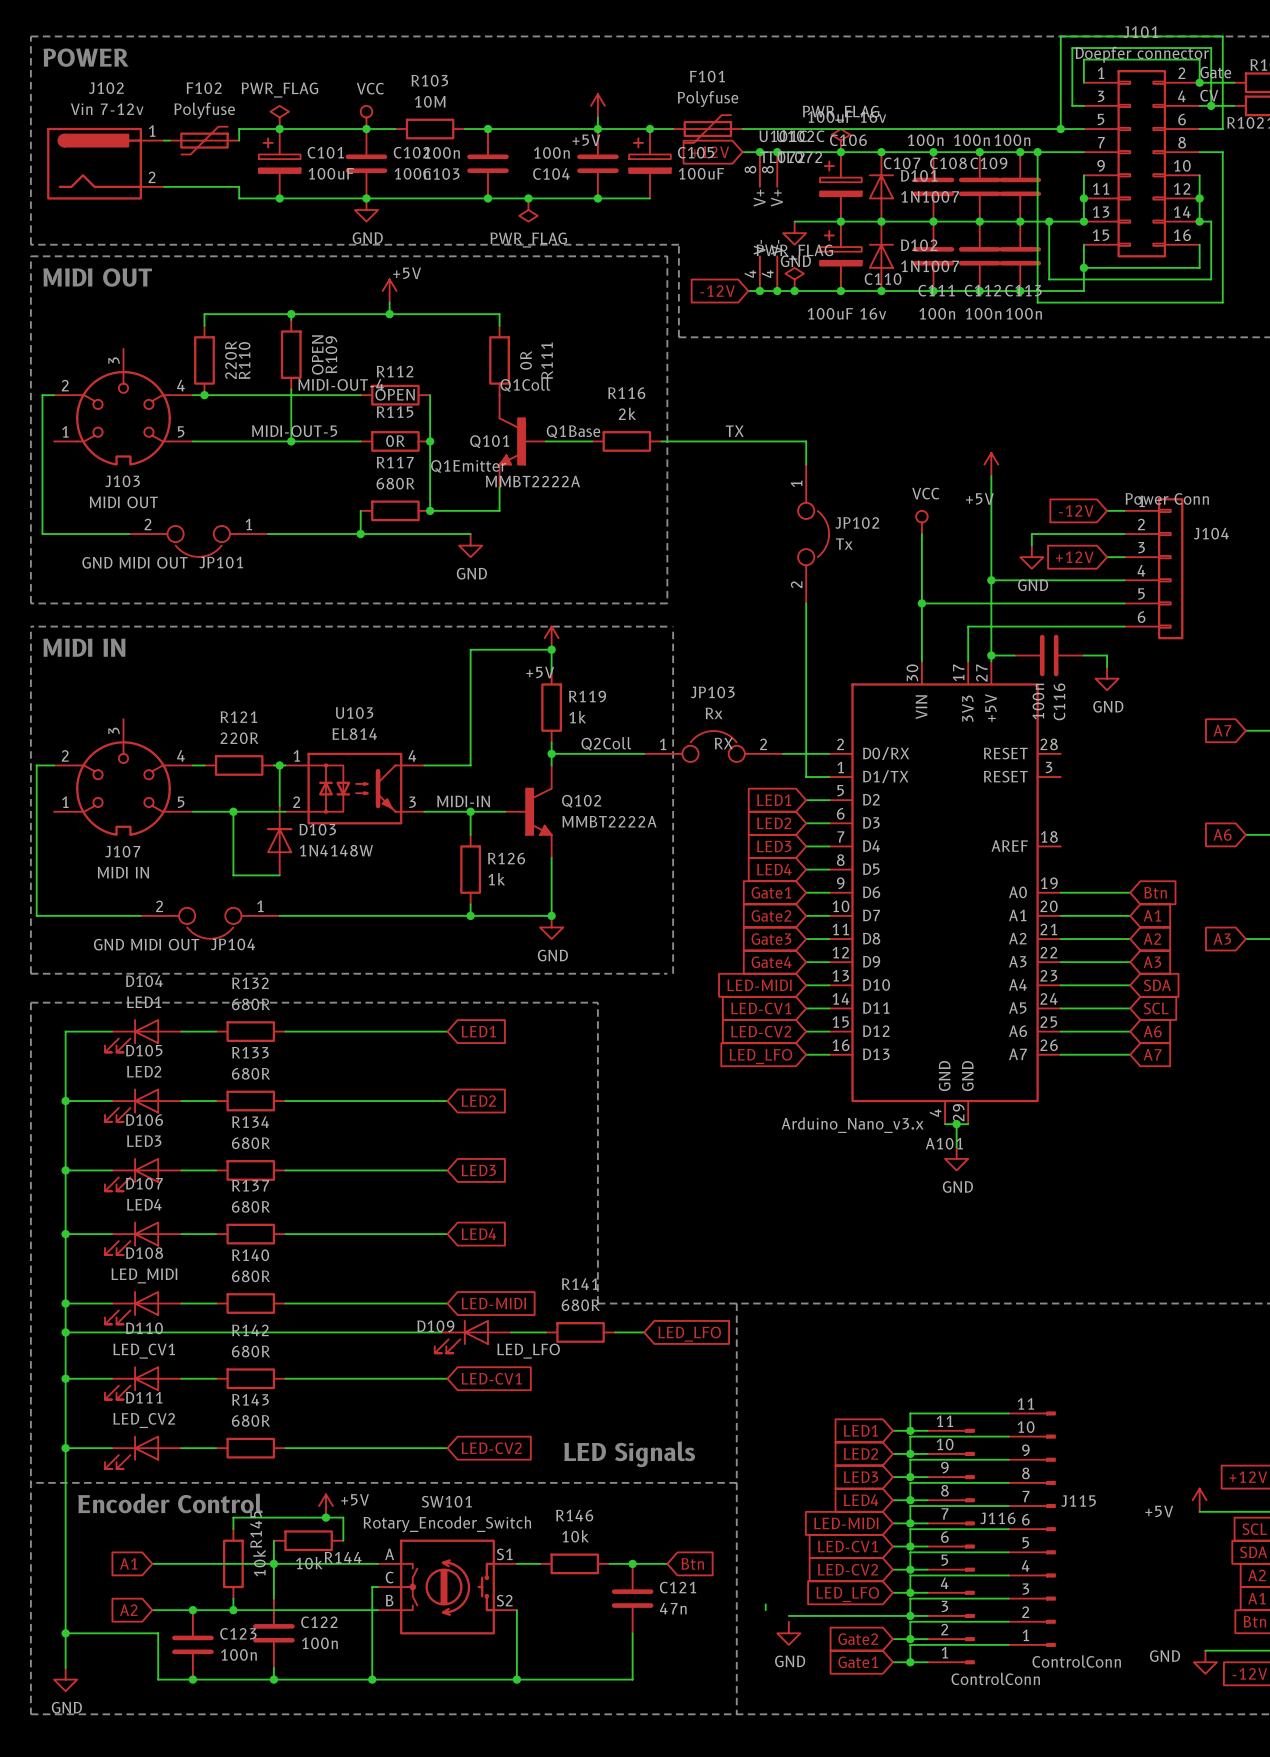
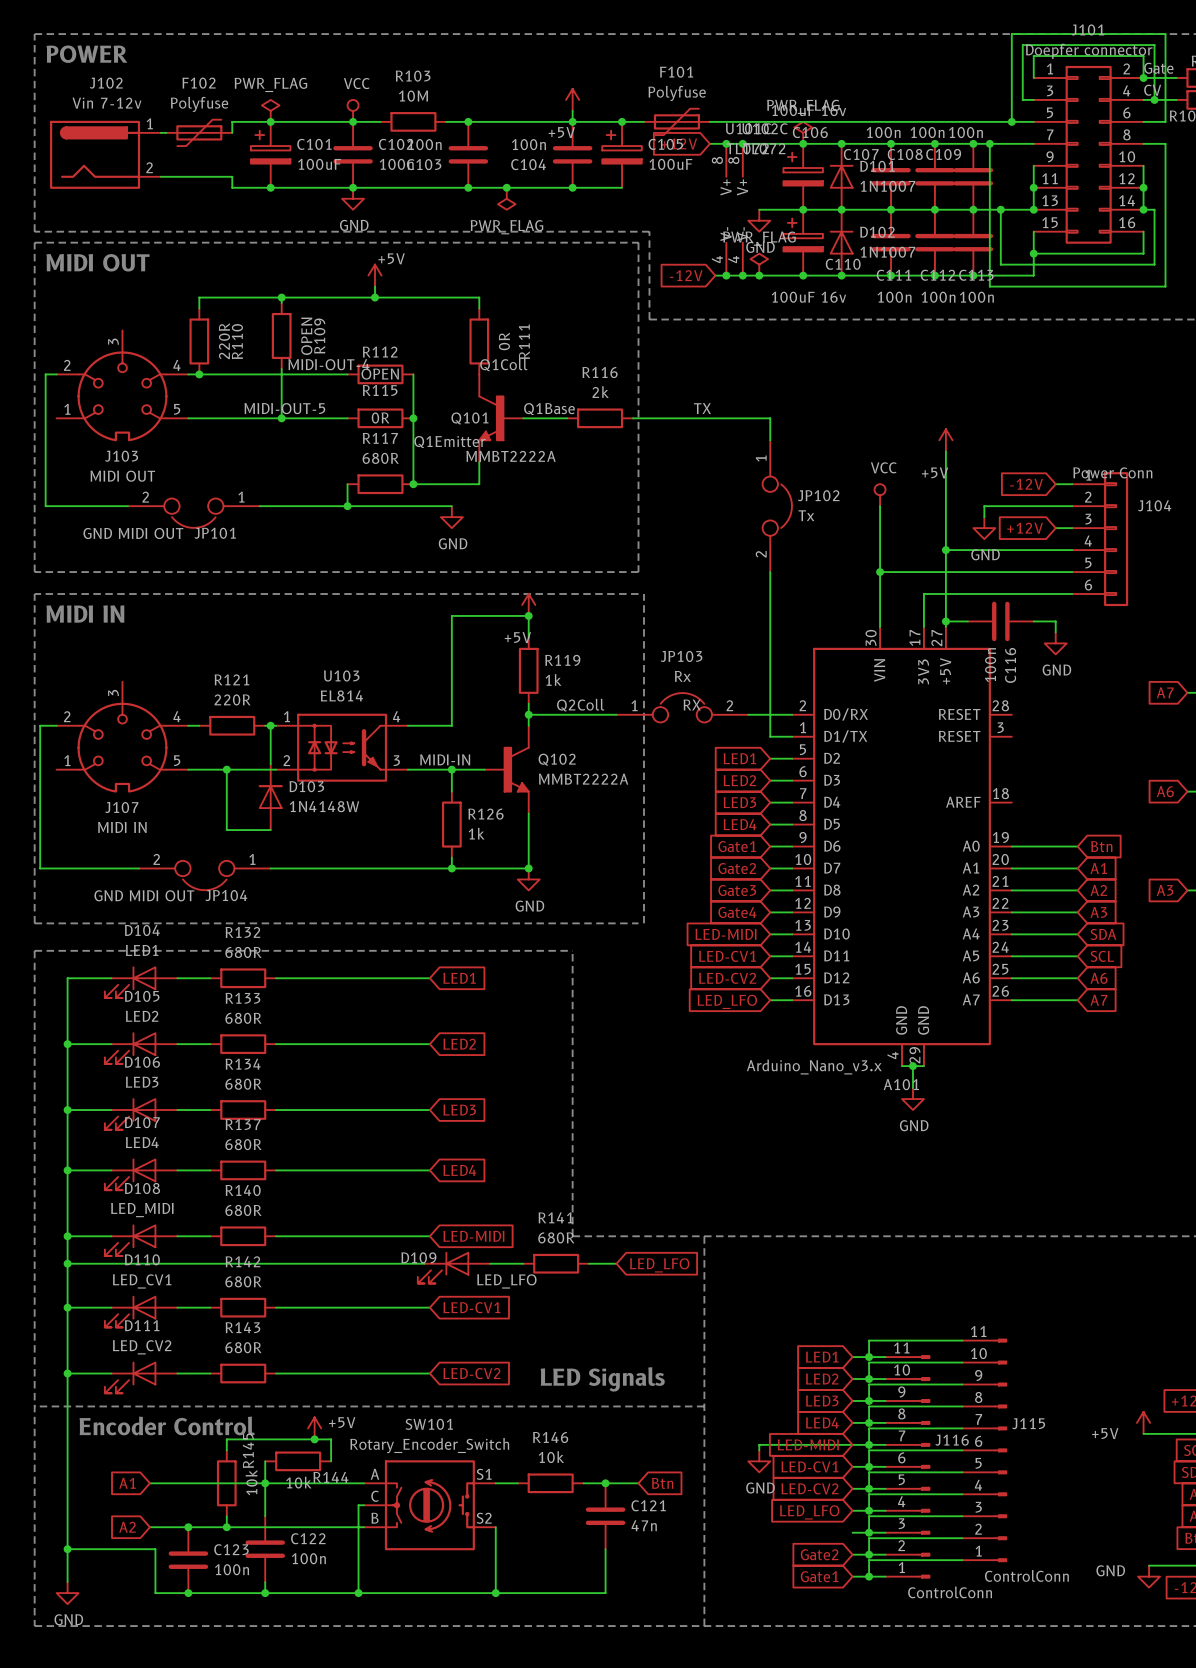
wire: none -> (852, 1444) (759, 1444) (759, 1450)
wire: (765, 1604) (765, 1610) -> none
wire: (788, 1615) (892, 1615) -> none
power symbol position: GND (788, 1633) -> GND (759, 1461)

